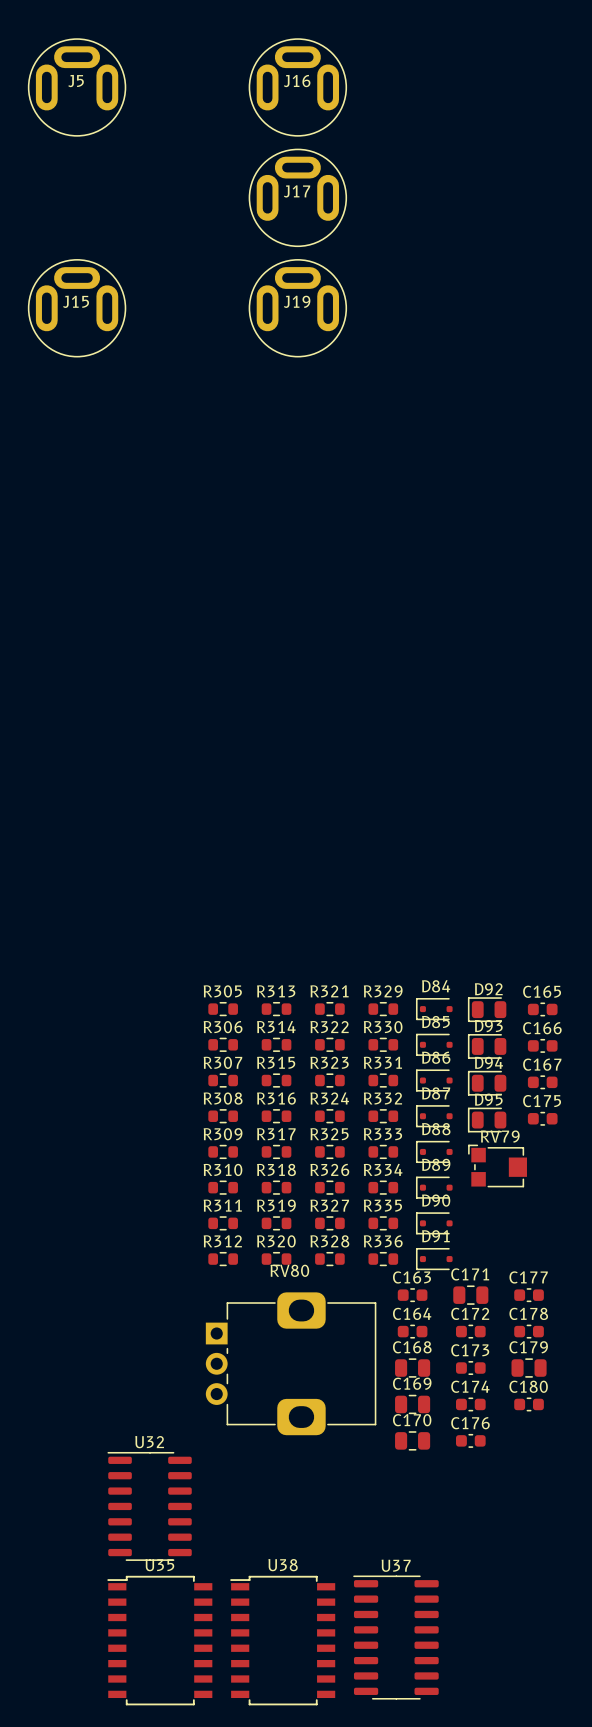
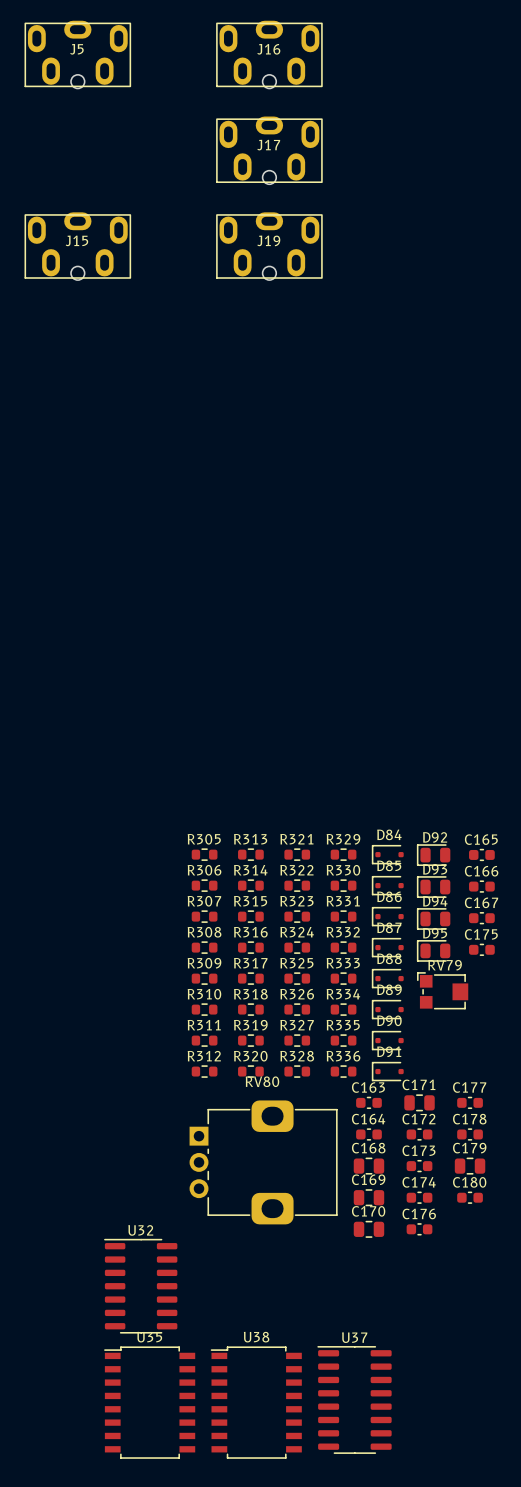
J5 footprint: [27, 38, 127, 137] -> [24, 20, 131, 89]
J16 footprint: [248, 38, 348, 137] -> [216, 20, 323, 89]
J17 footprint: [248, 148, 348, 248] -> [216, 116, 323, 185]
J15 footprint: [27, 259, 127, 358] -> [24, 212, 131, 281]
J19 footprint: [248, 259, 348, 358] -> [216, 212, 323, 281]

